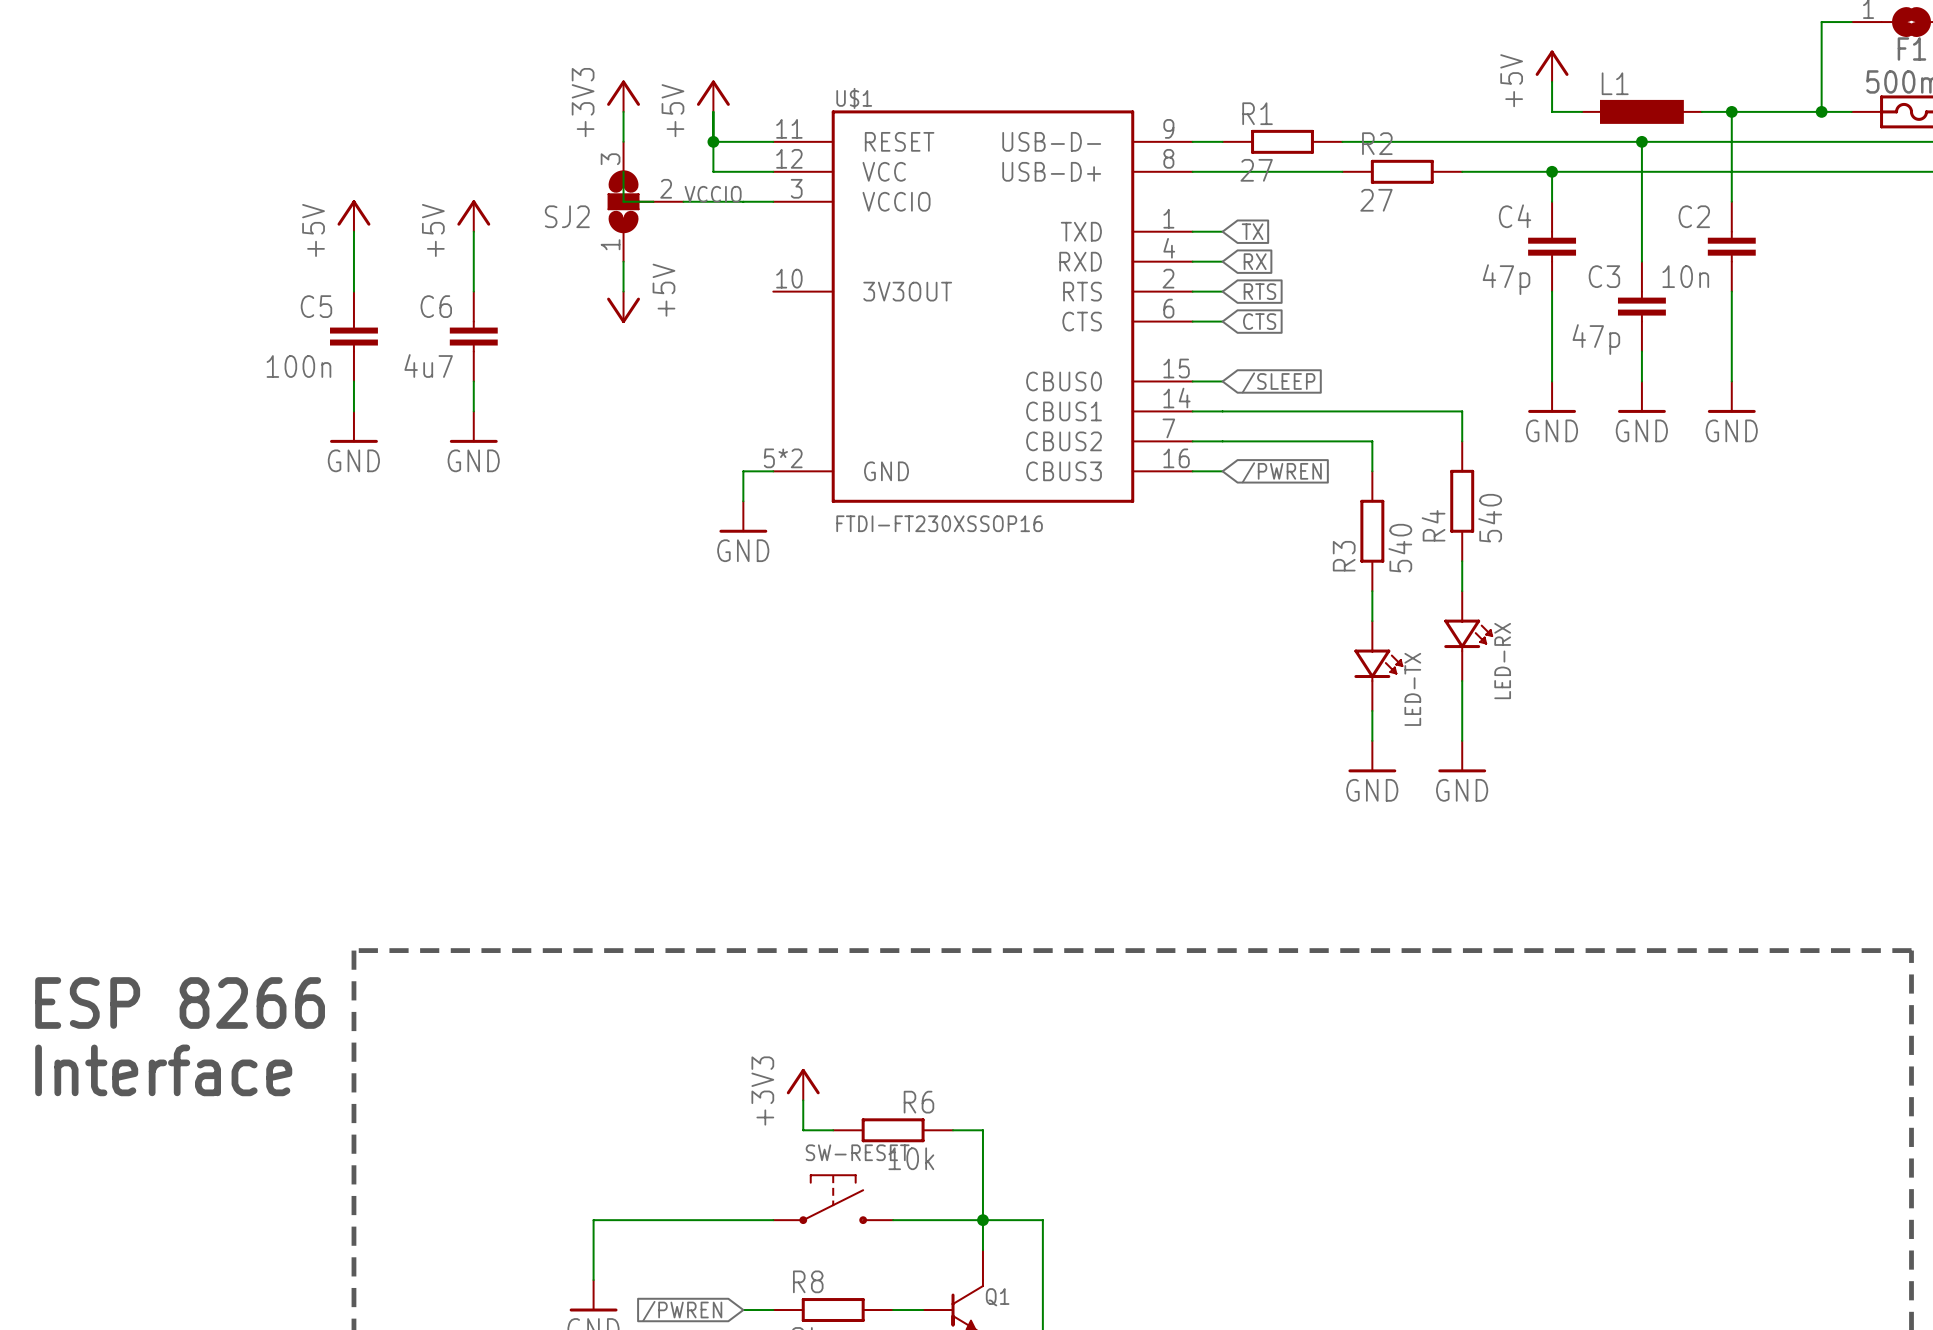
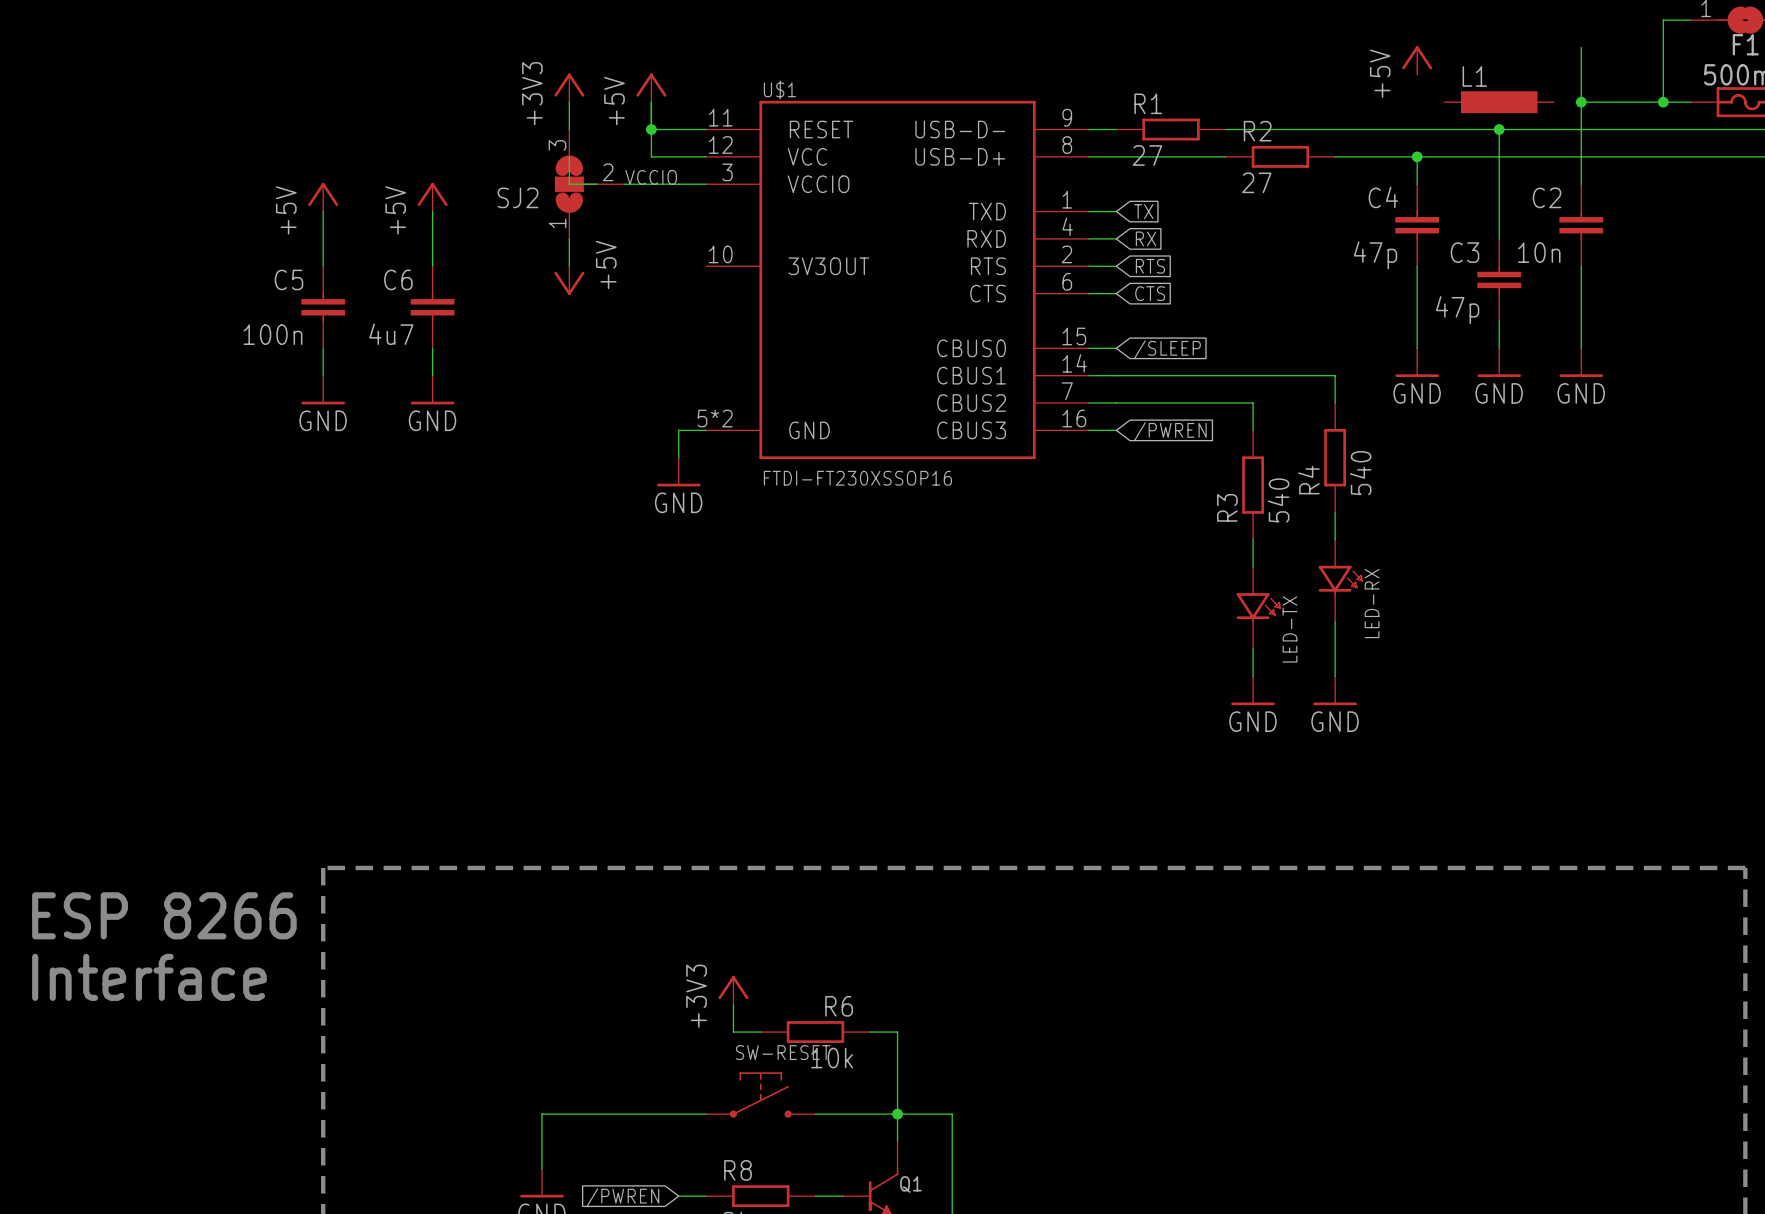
wire: (1552, 81) (1552, 111) (1582, 111) -> none
wire: (1701, 111) (1731, 111) -> (1581, 47) (1581, 102)

